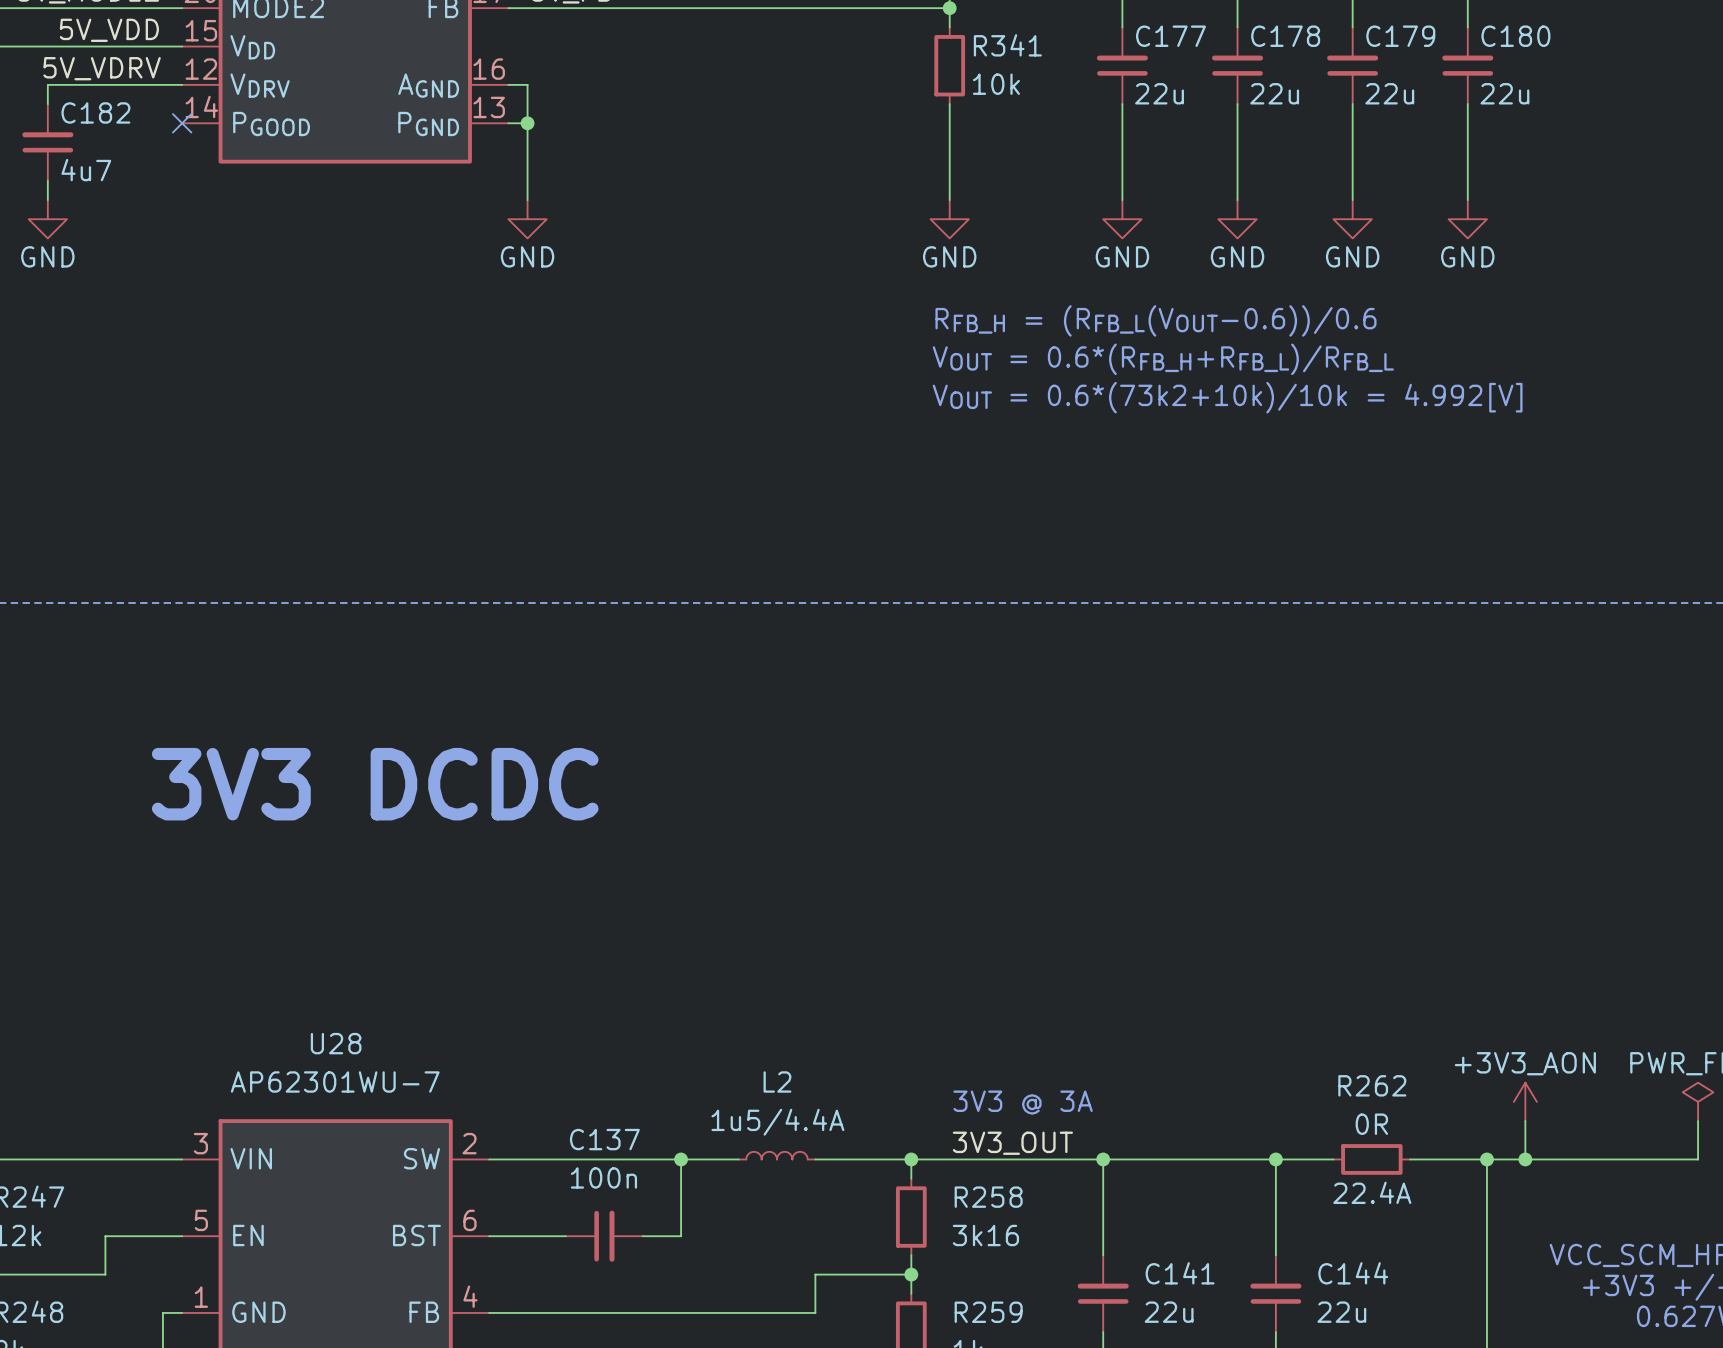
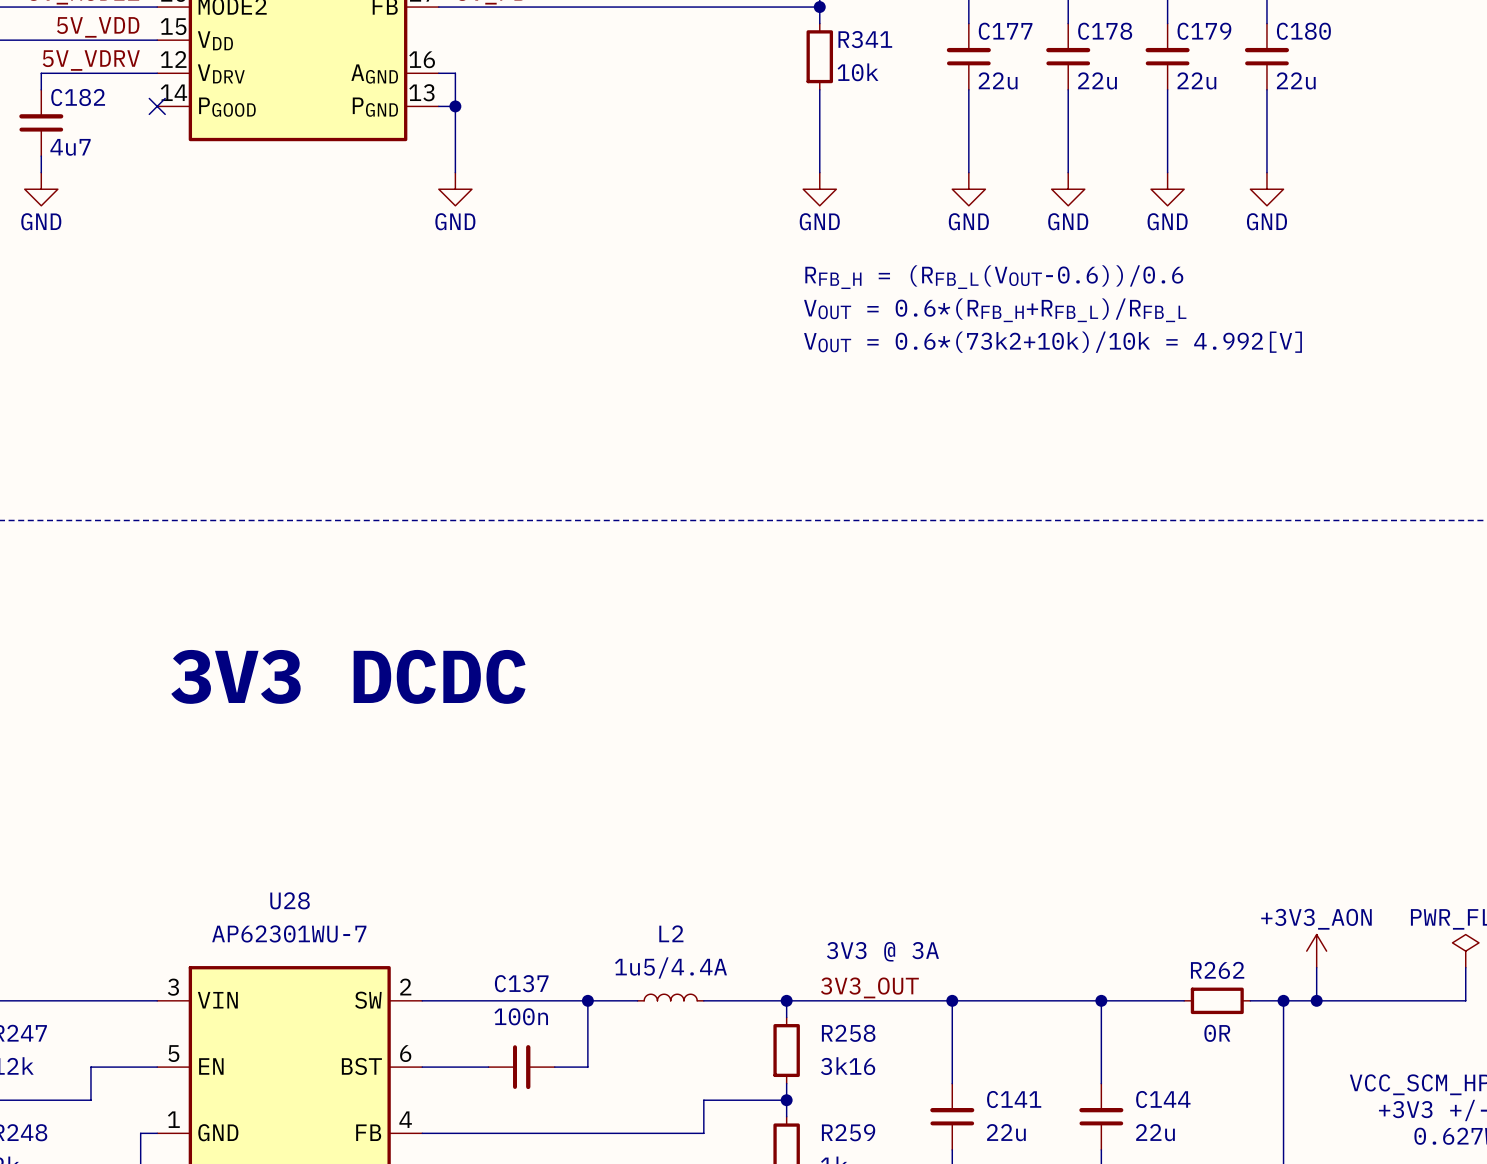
R262 name position: R262 (1372, 1085) -> R262 (1217, 970)
R262 text position: 0R (1371, 1124) -> 0R (1217, 1033)
R262 position: (1371, 1159) -> (1217, 1000)
wire: (1410, 1159) (1448, 1159) -> (1151, 1000) (1184, 1000)
R262 text: 22.4A (1372, 1192) -> none

